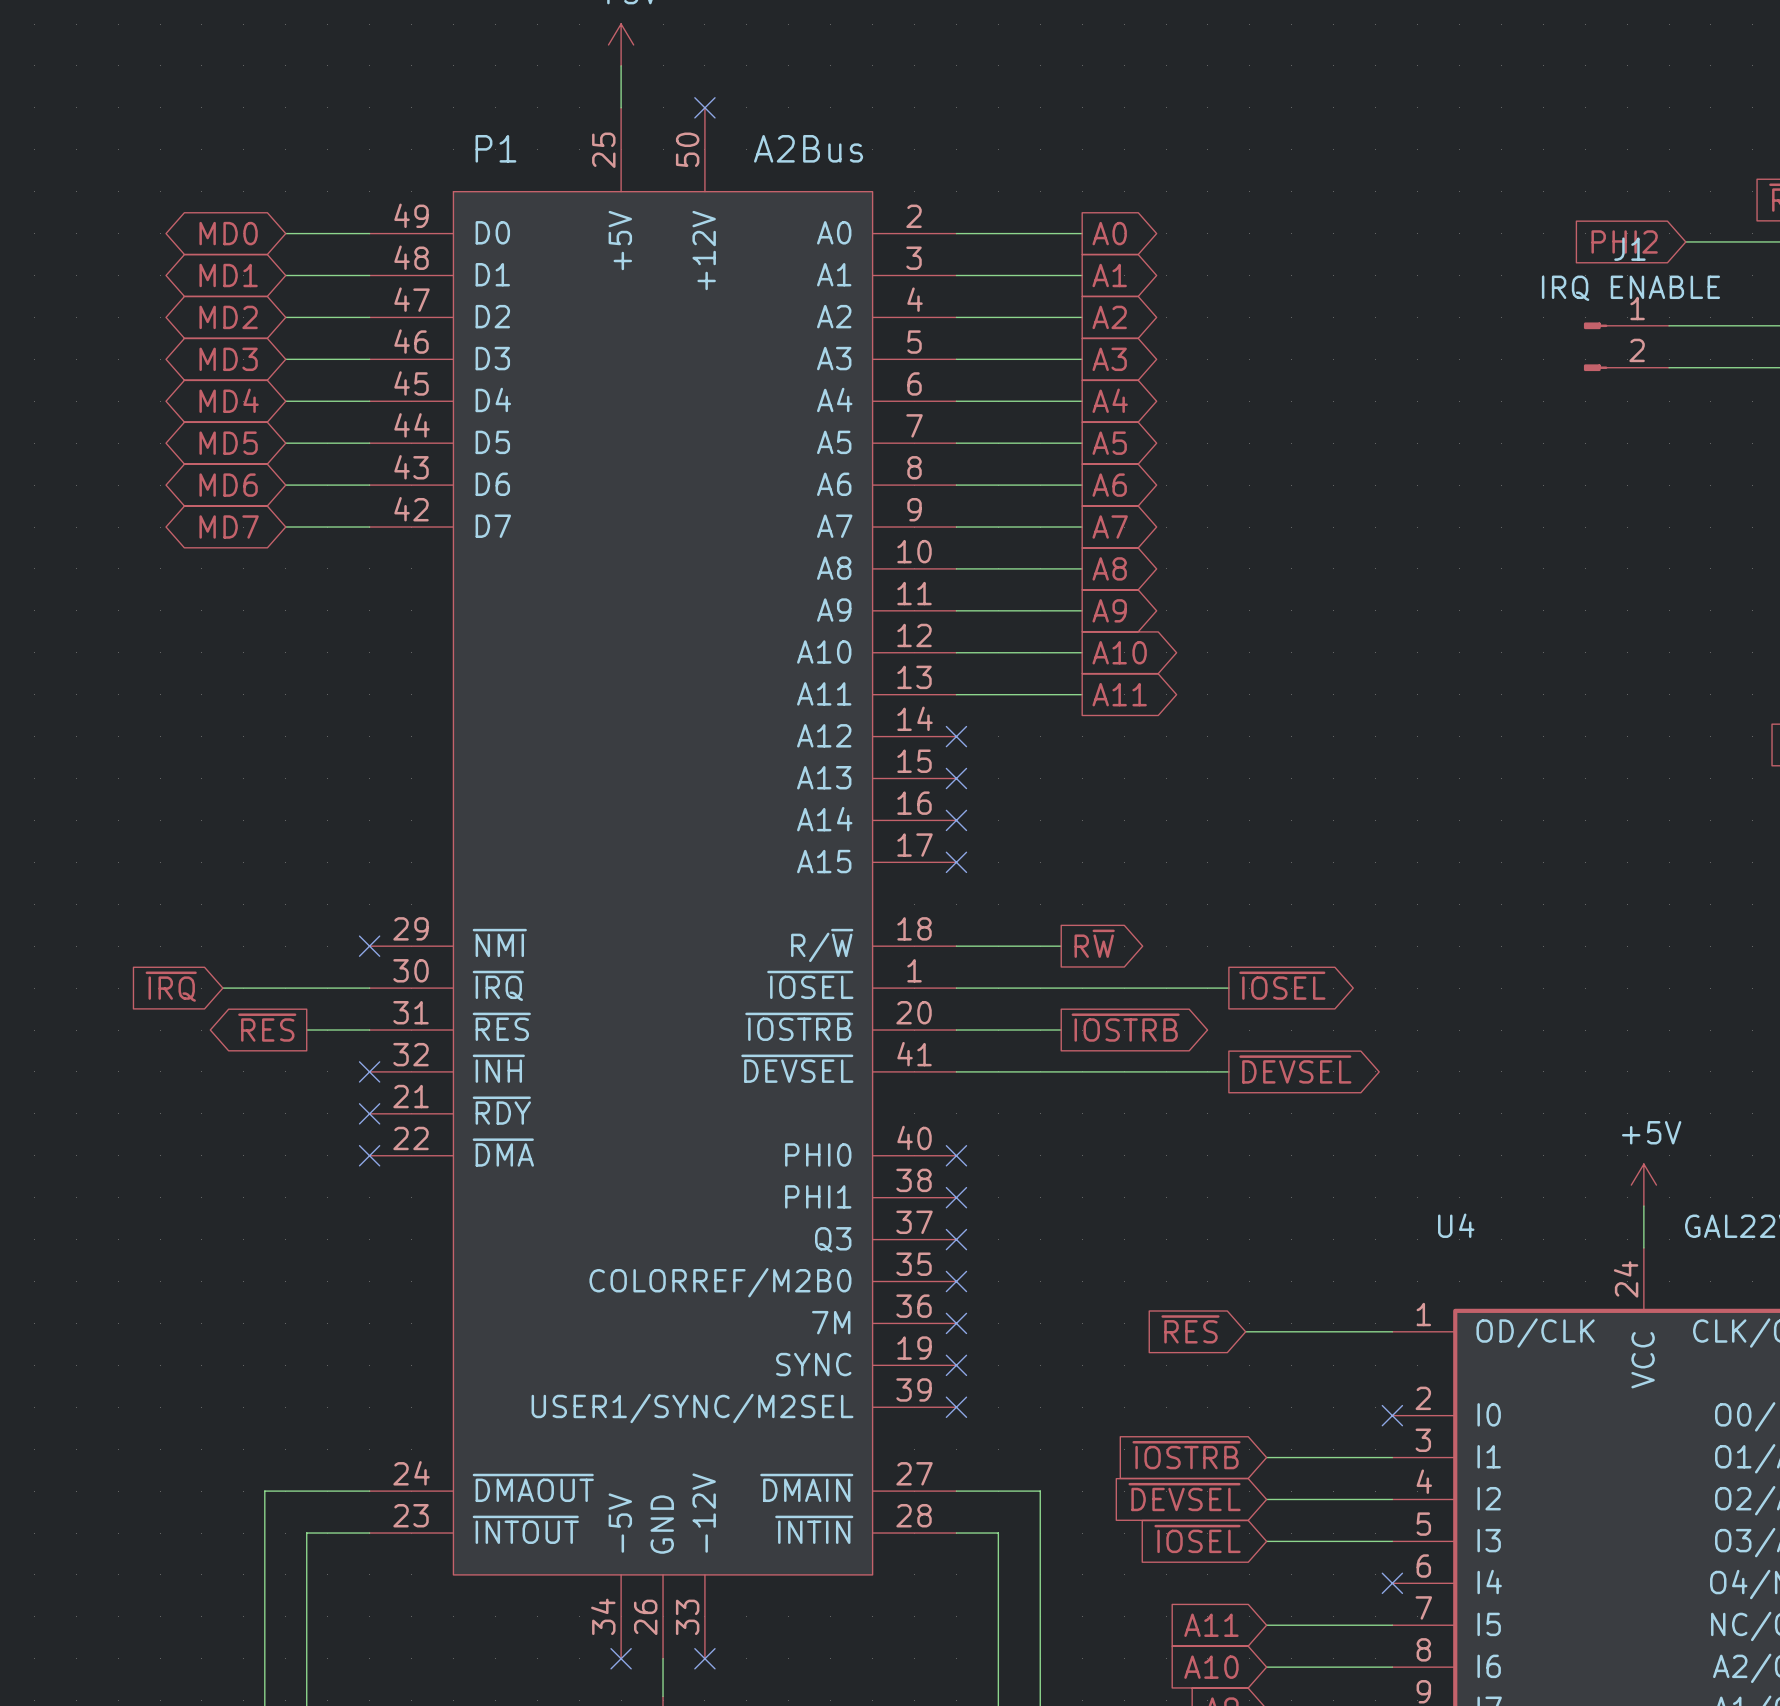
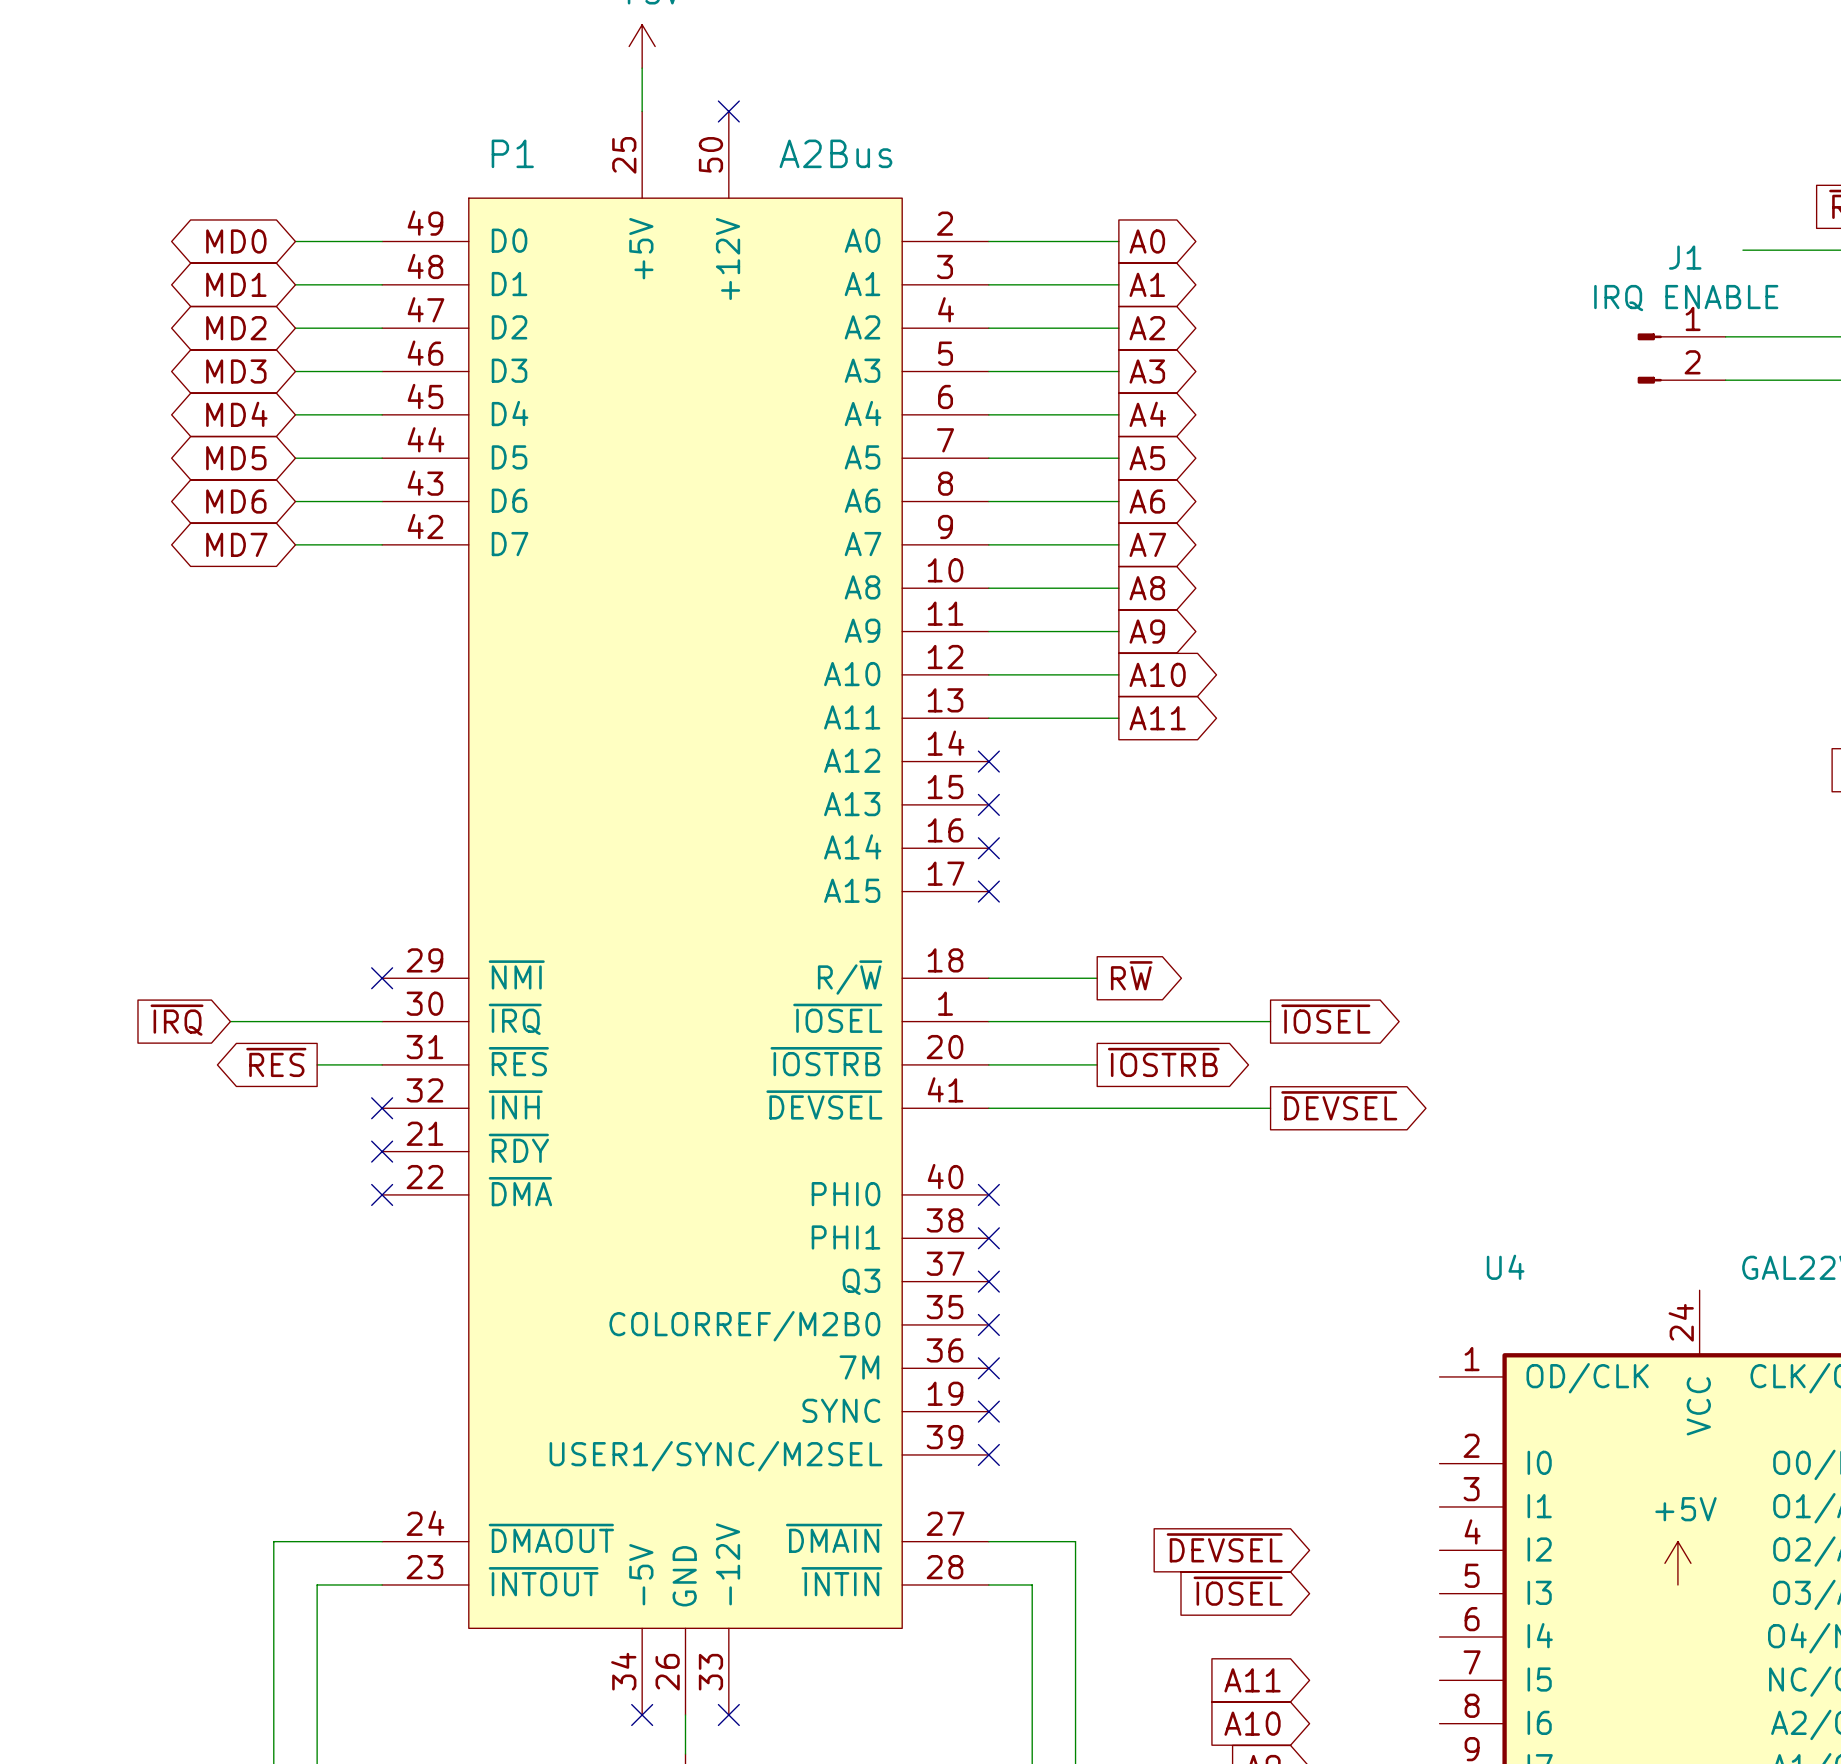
global label: PHI2 (1624, 241) -> none
power symbol: +5V (1643, 1185) -> none
wire: (1643, 1206) (1643, 1247) -> none
global label: ~{RES} (1190, 1329) -> none
wire: (1245, 1331) (1392, 1331) -> none
no-connect mark: (1392, 1415) -> none
global label: ~{IOSTRB} (1186, 1455) -> none
wire: (1266, 1457) (1392, 1457) -> none
wire: (1266, 1499) (1392, 1499) -> none
power symbol: none -> +5V (1677, 1563)
wire: (1266, 1541) (1392, 1541) -> none
no-connect mark: (1392, 1583) -> none
wire: (1266, 1625) (1392, 1625) -> none
wire: (1266, 1667) (1392, 1667) -> none

